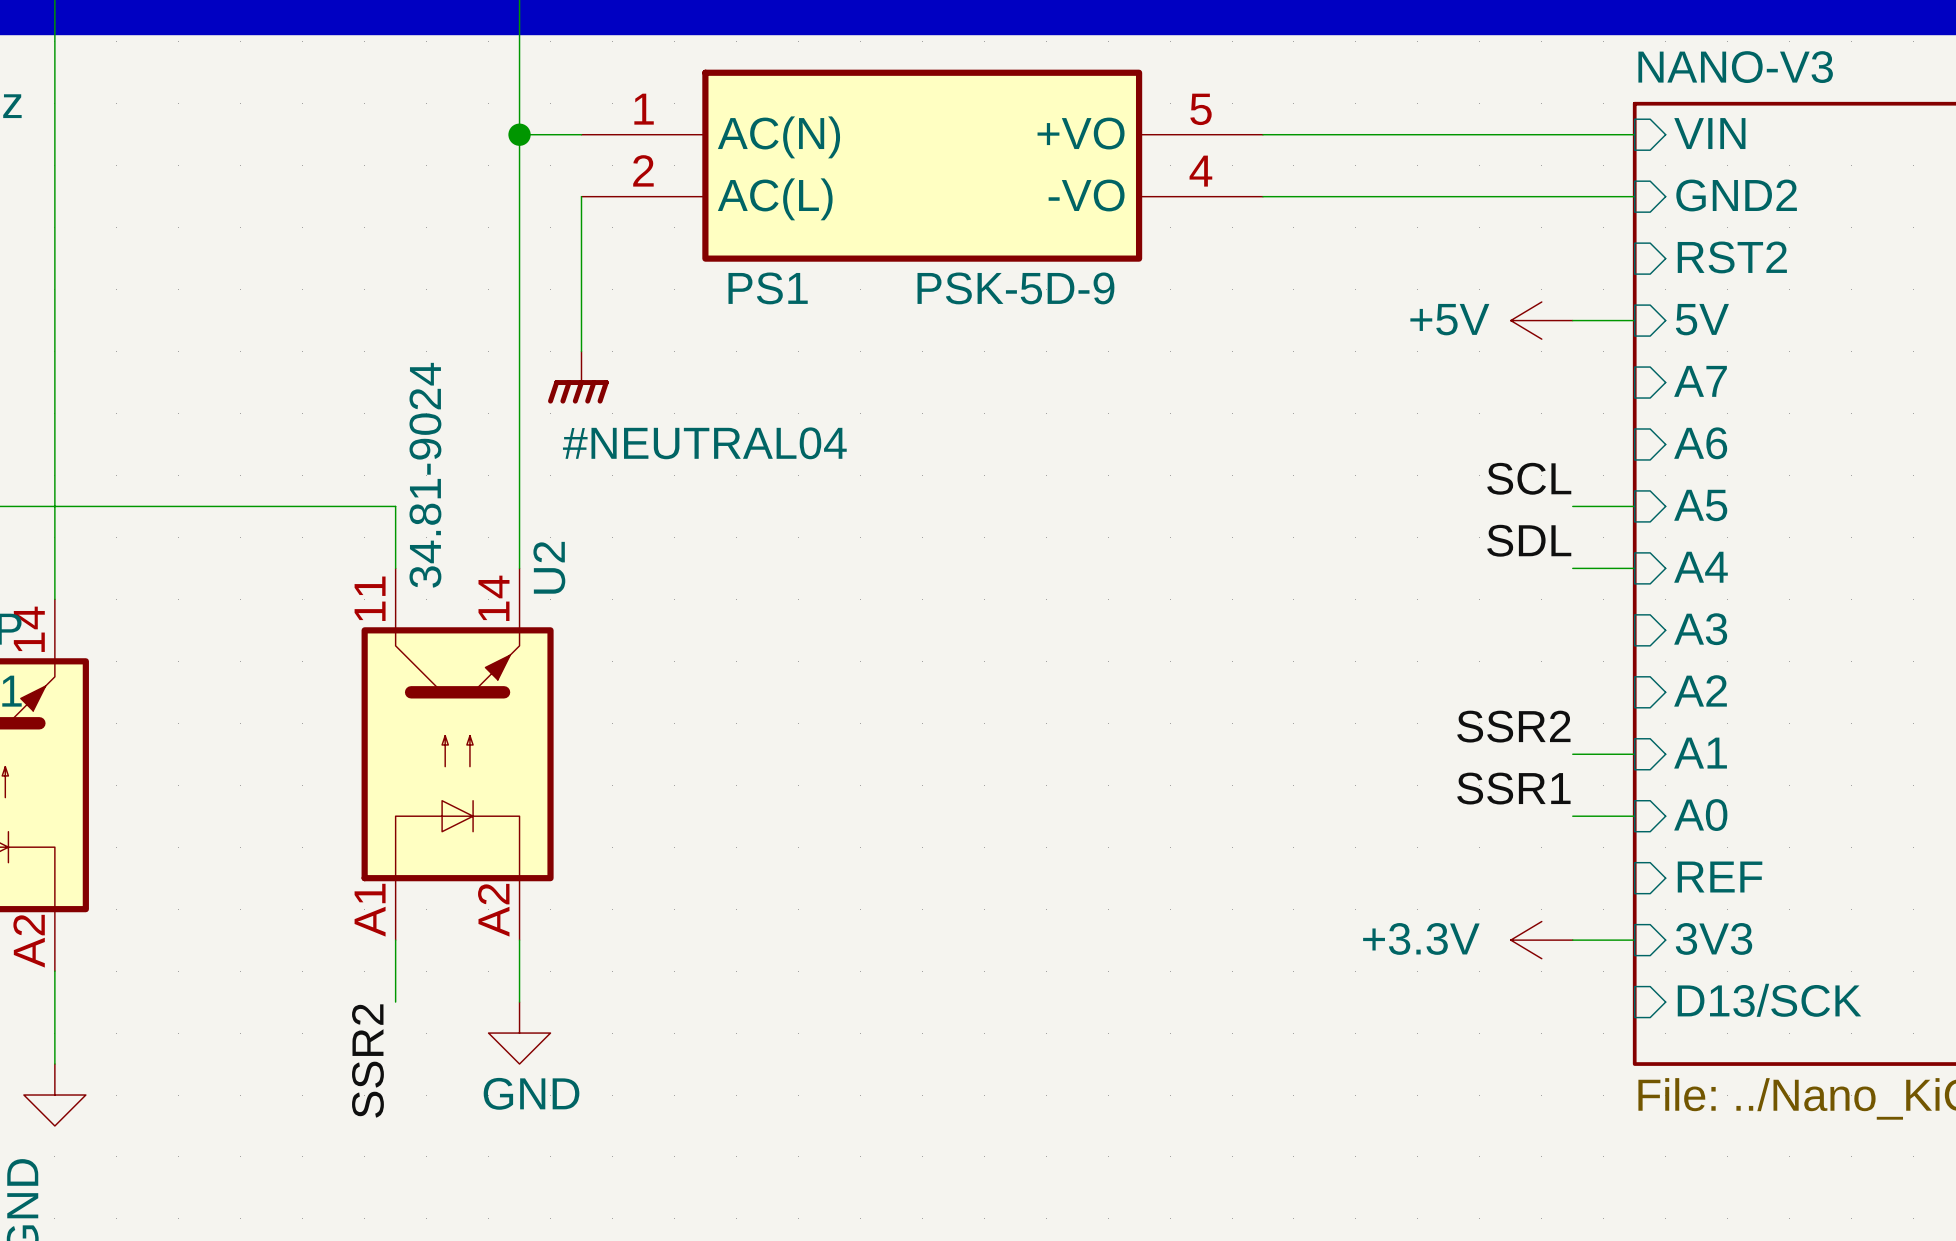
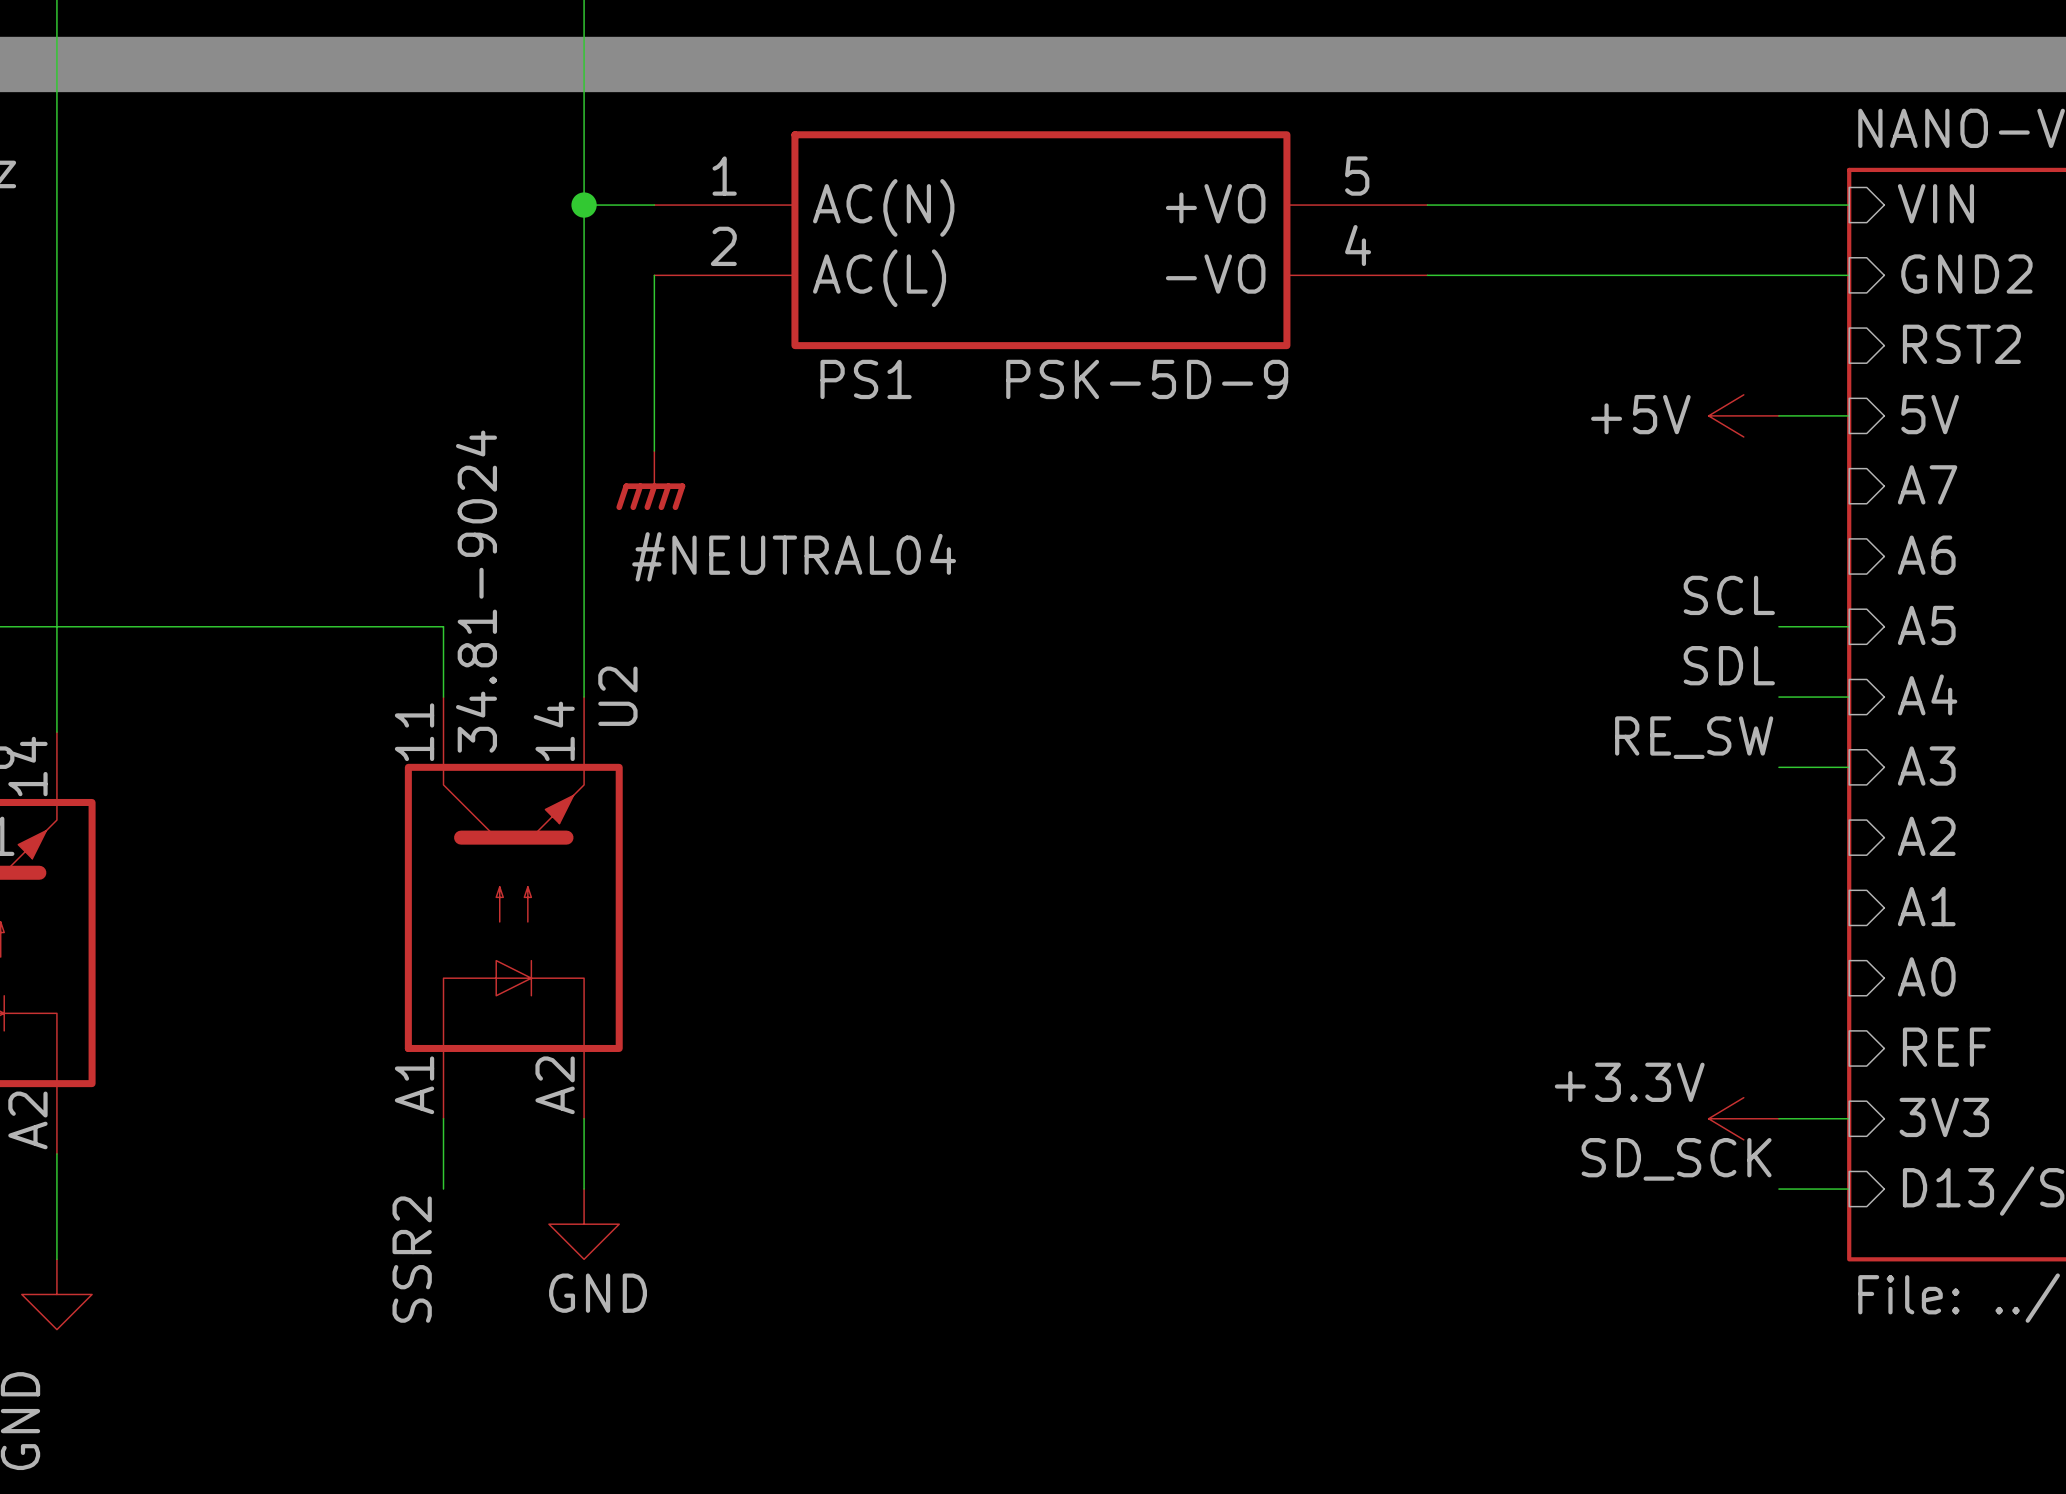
label: none -> RE_SW (1694, 737)
label: SSR2 (1513, 726) -> none
wire: (1572, 754) (1634, 754) -> (1778, 767) (1849, 767)
label: SSR1 (1513, 788) -> none
wire: (1572, 816) (1634, 816) -> (1778, 1189) (1849, 1189)
power symbol text position: +3.3V (1421, 938) -> +3.3V (1629, 1082)
label: none -> SD_SCK (1676, 1159)

